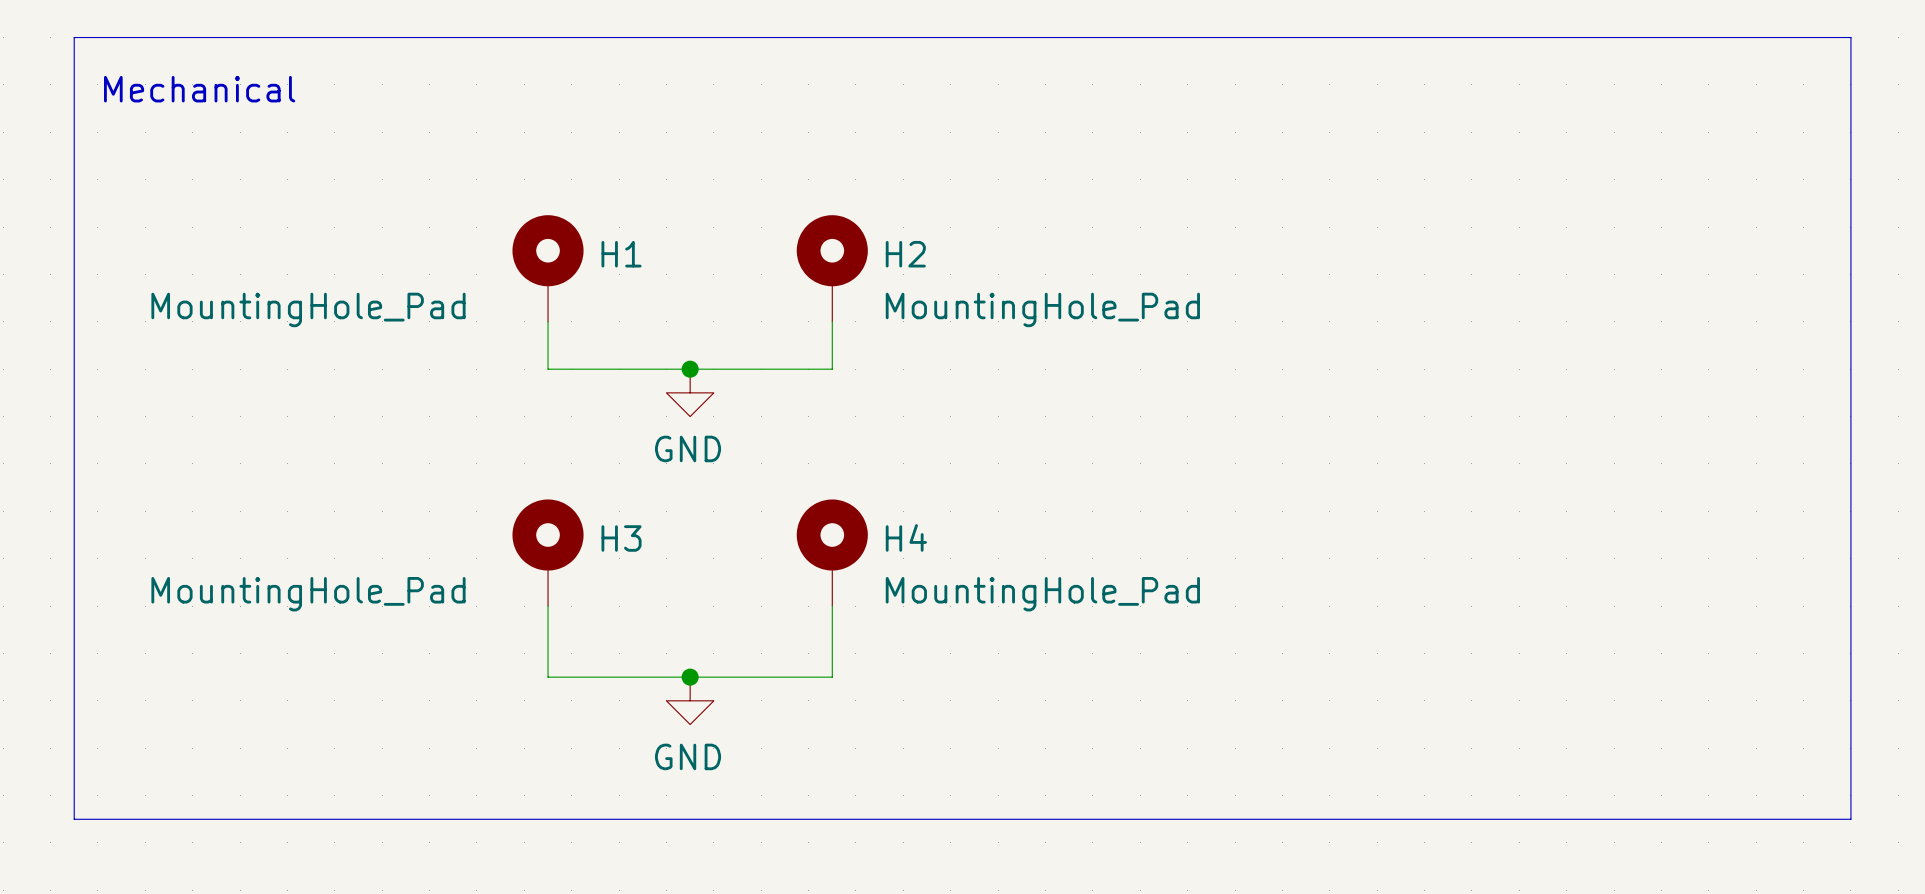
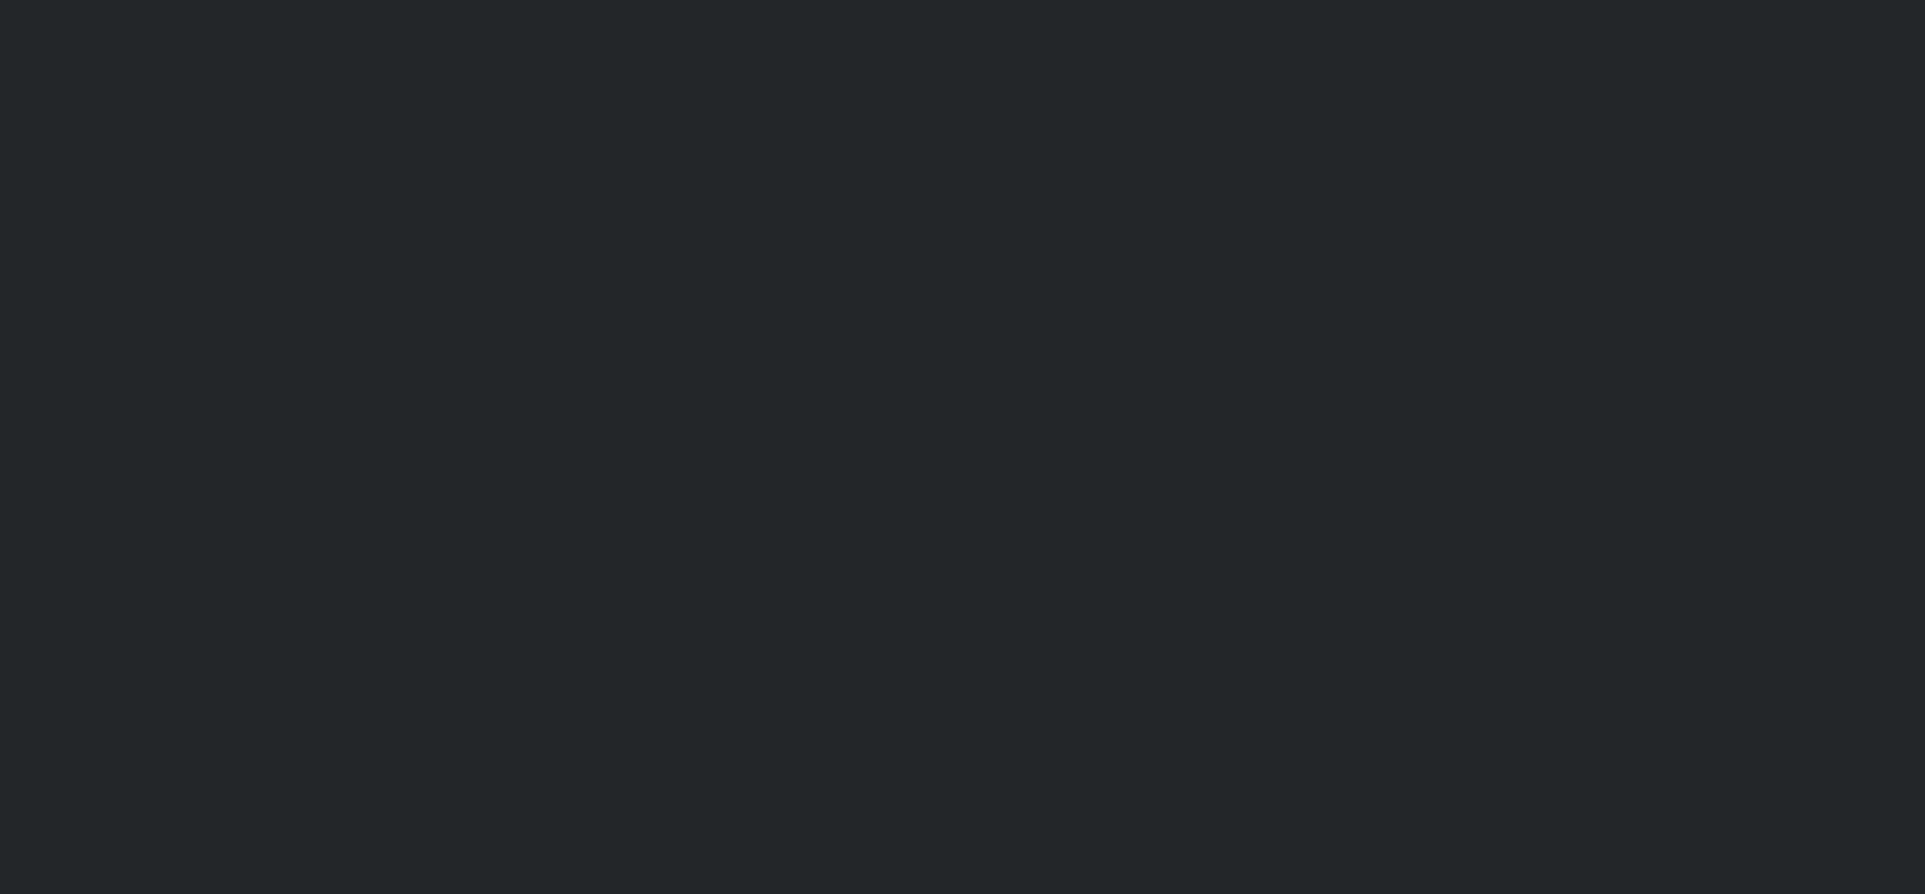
line: (74, 37) (74, 819) (1850, 819) (1850, 37) (74, 37) -> none
text: Mechanical (199, 89) -> none
H1: MountingHole_Pad (548, 268) -> none
H2: MountingHole_Pad (832, 268) -> none
wire: (548, 321) (548, 369) (832, 369) (832, 321) -> none
junction: (690, 369) -> none
power symbol: GND (690, 392) -> none
H3: MountingHole_Pad (548, 552) -> none
H4: MountingHole_Pad (832, 552) -> none
wire: (548, 606) (548, 677) (832, 677) (832, 606) -> none
junction: (690, 677) -> none
power symbol: GND (690, 700) -> none

